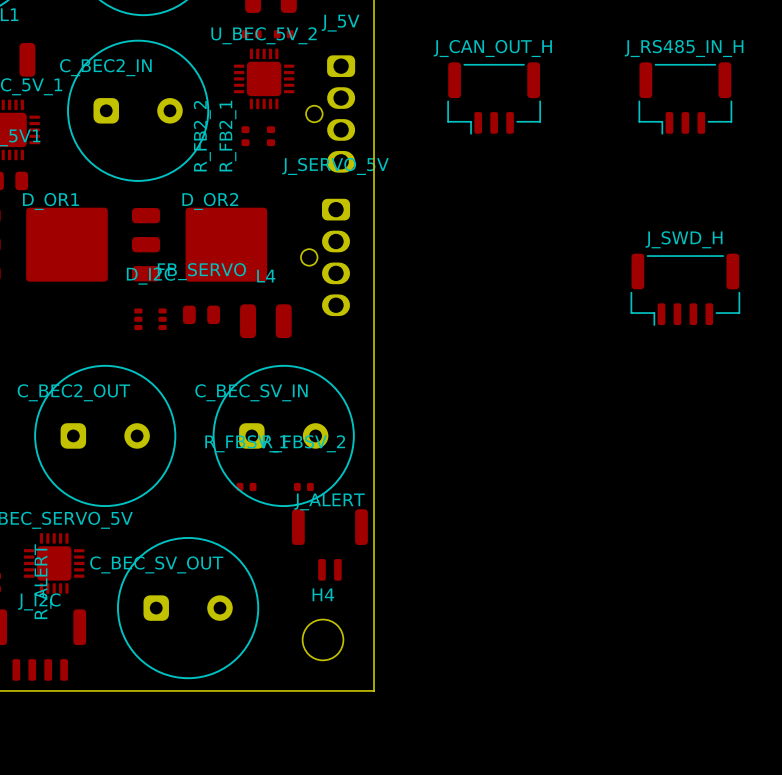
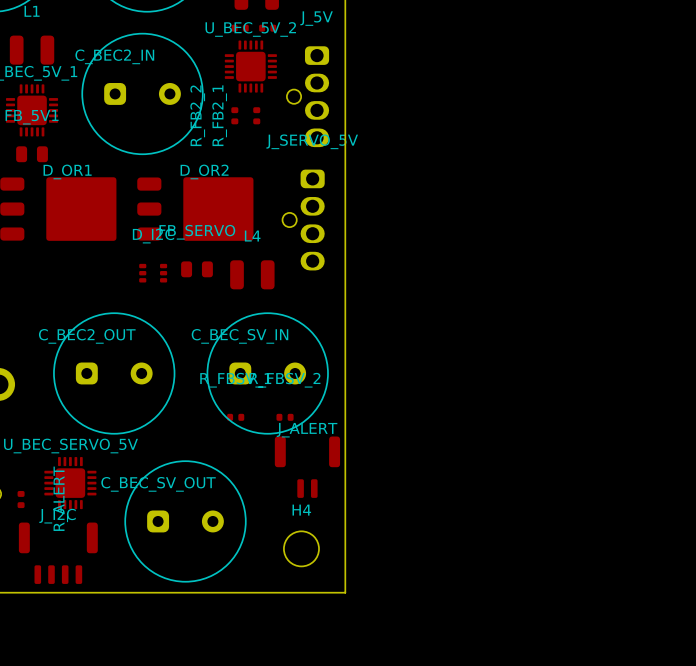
J_CAN_OUT_H: (494, 98) -> none
J_RS485_IN_H: (685, 98) -> none
J_SWD_H: (685, 289) -> none

